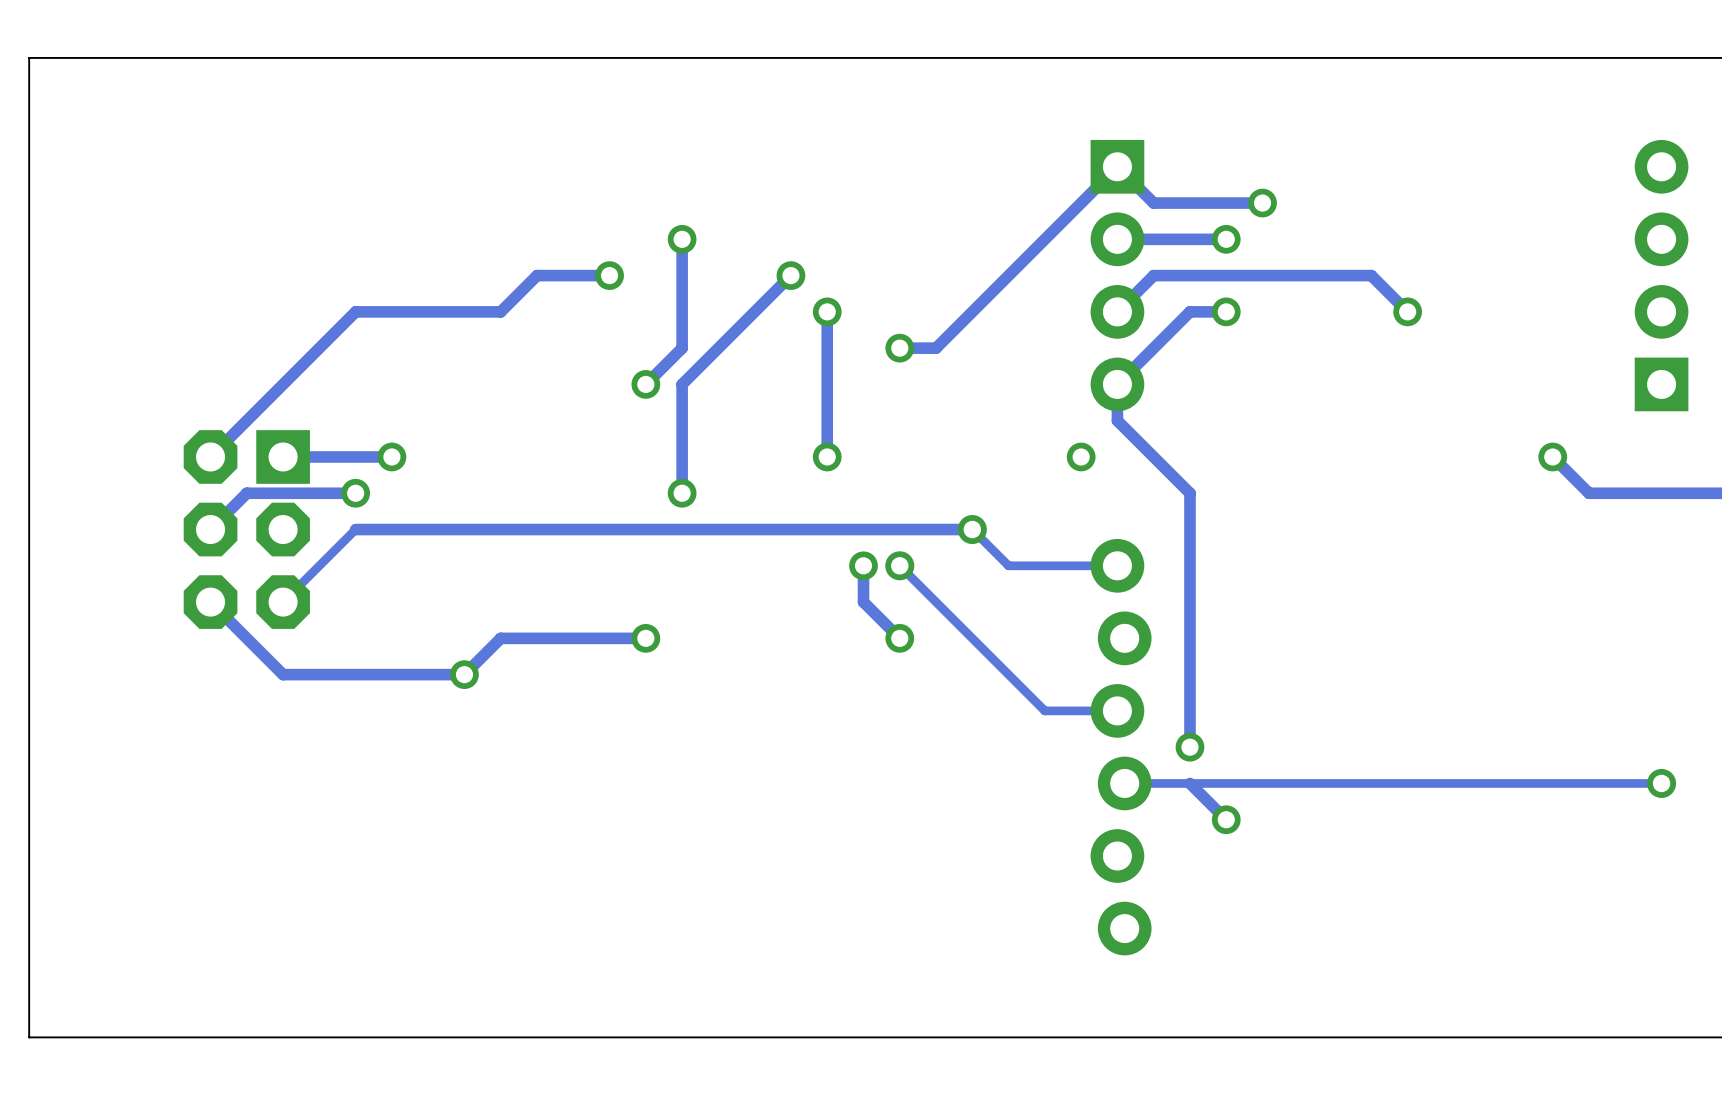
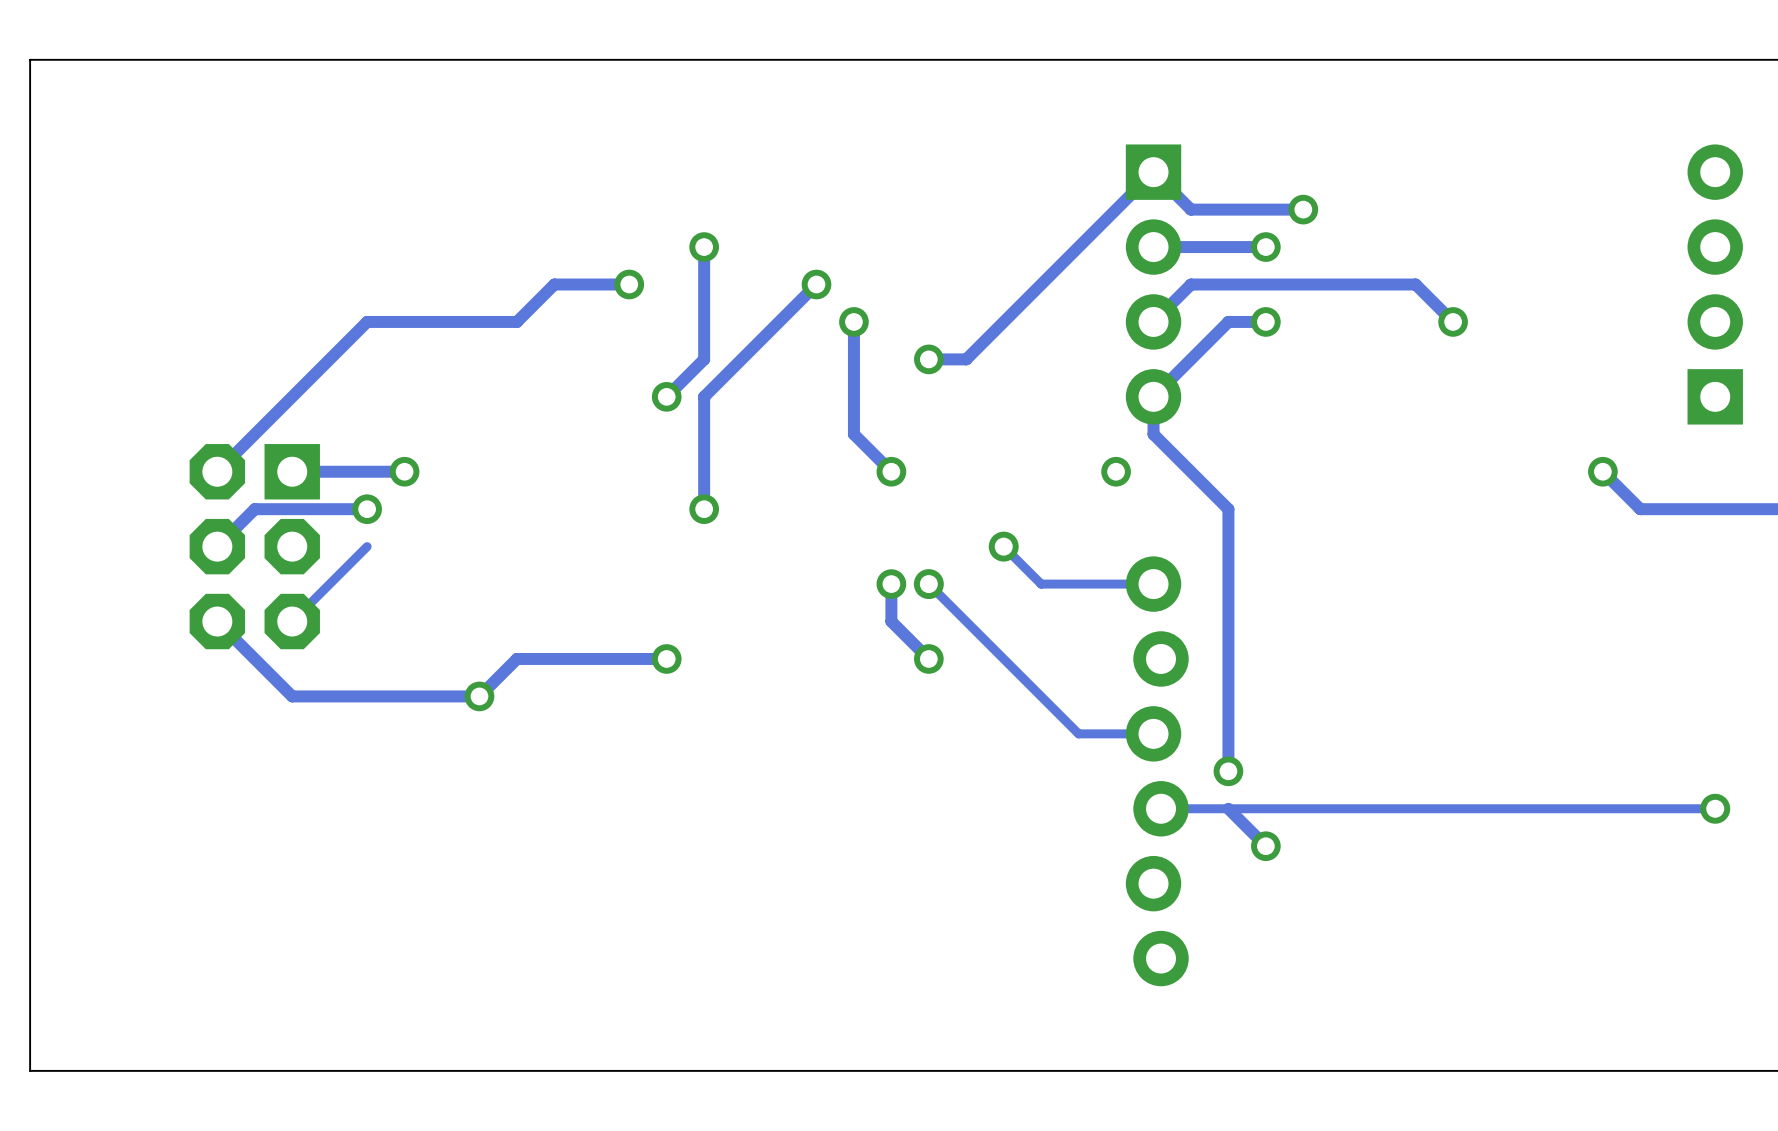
track: (827, 420) (827, 456) -> (853, 434) (891, 471)
via position: (827, 456) -> (891, 471)
track: (972, 529) (355, 529) -> none

